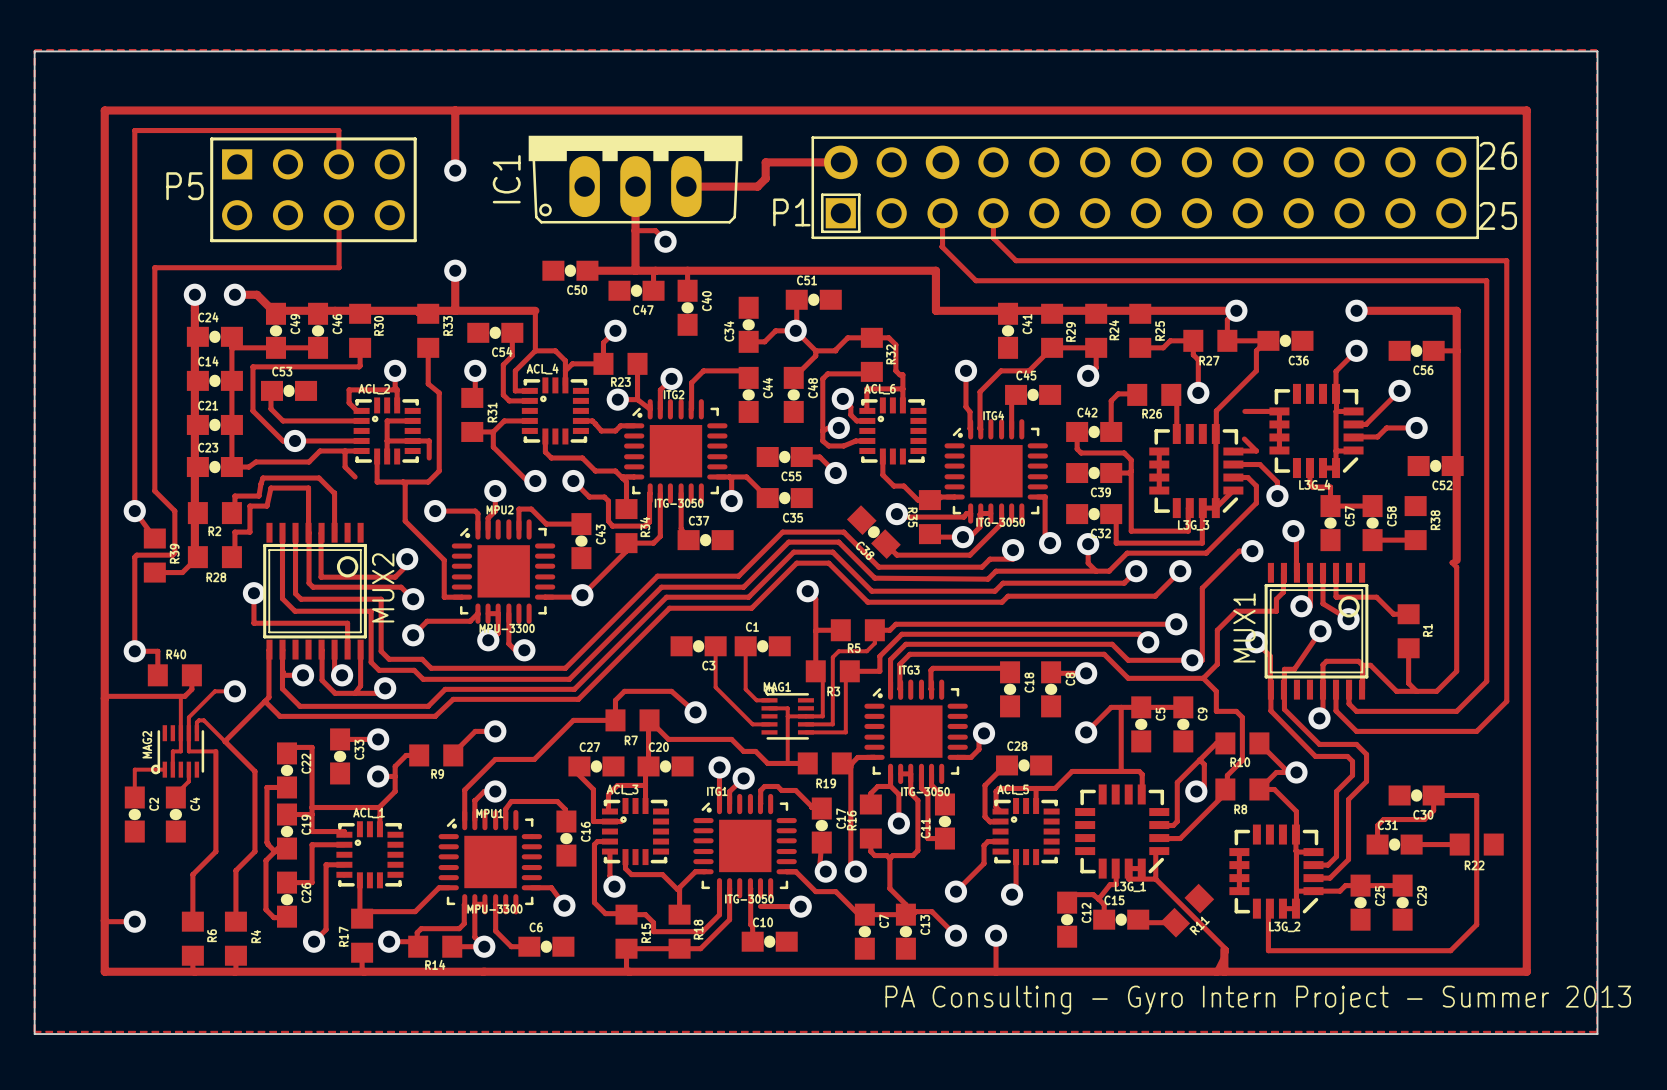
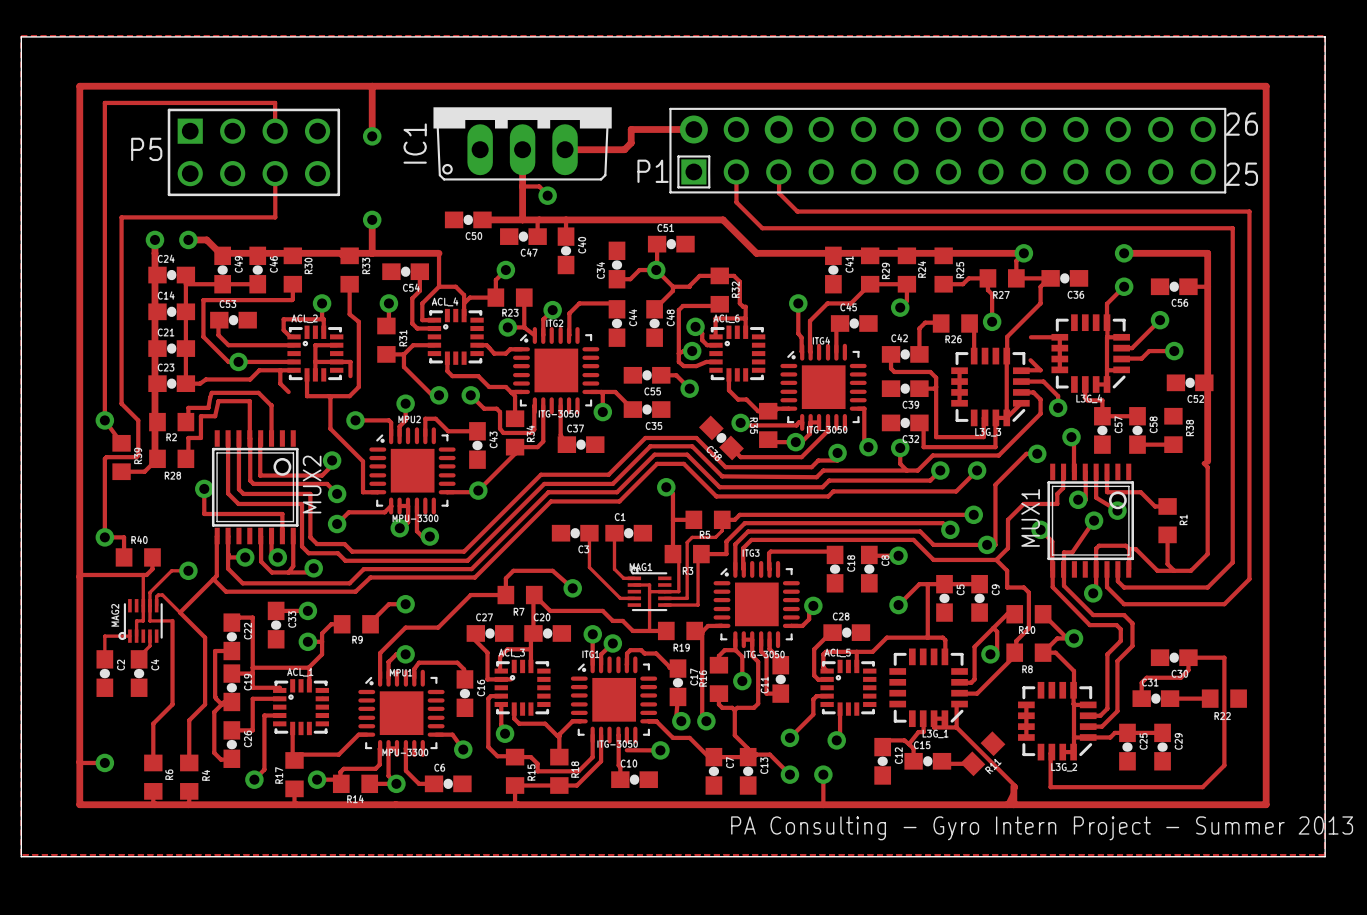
track: none -> (736, 172) (736, 202) (762, 228) (806, 228)
track: (942, 213) (941, 246) (976, 280) -> (778, 171) (779, 193) (797, 211) (840, 211)
track: (993, 213) (993, 238) (1016, 260) -> none
track: (875, 270) (935, 270) (935, 310) -> (723, 219) (756, 253) (773, 253)

